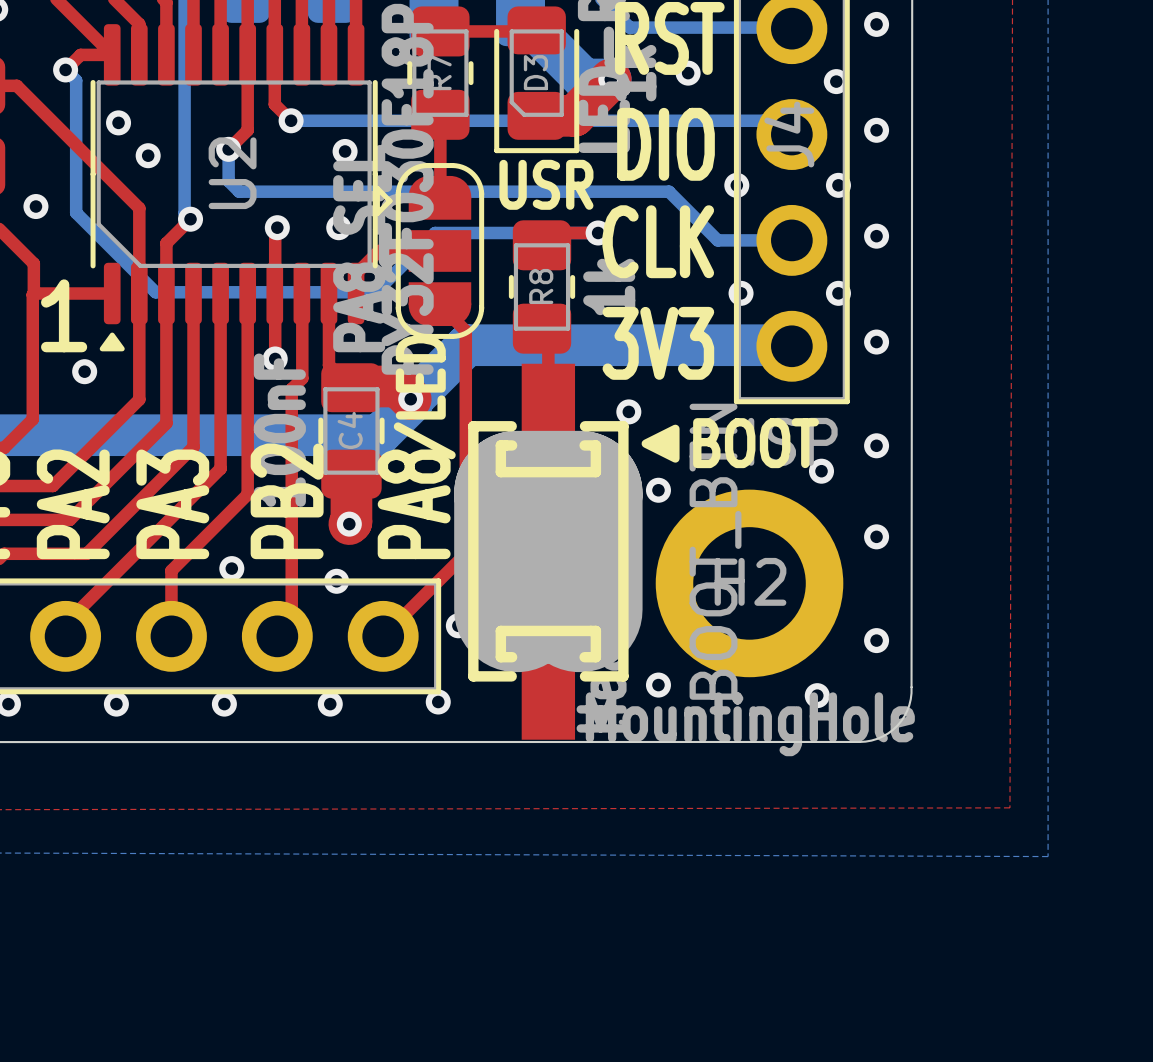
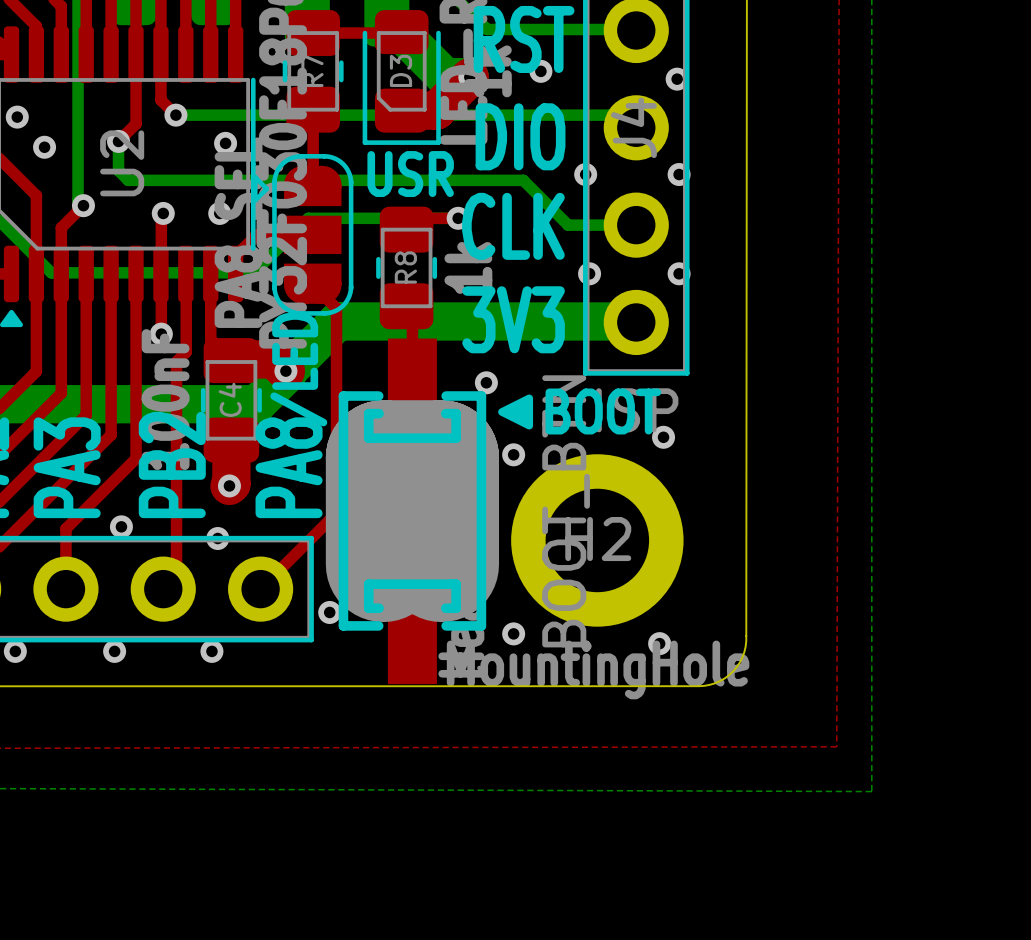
via: (876, 24) -> none
via: (876, 130) -> none
via: (876, 236) -> none
via: (876, 342) -> none
via: (876, 445) -> none
via: (876, 536) -> none
via: (458, 625) -> none
via: (876, 640) -> none
via: none -> (329, 612)
via: (438, 701) -> none

